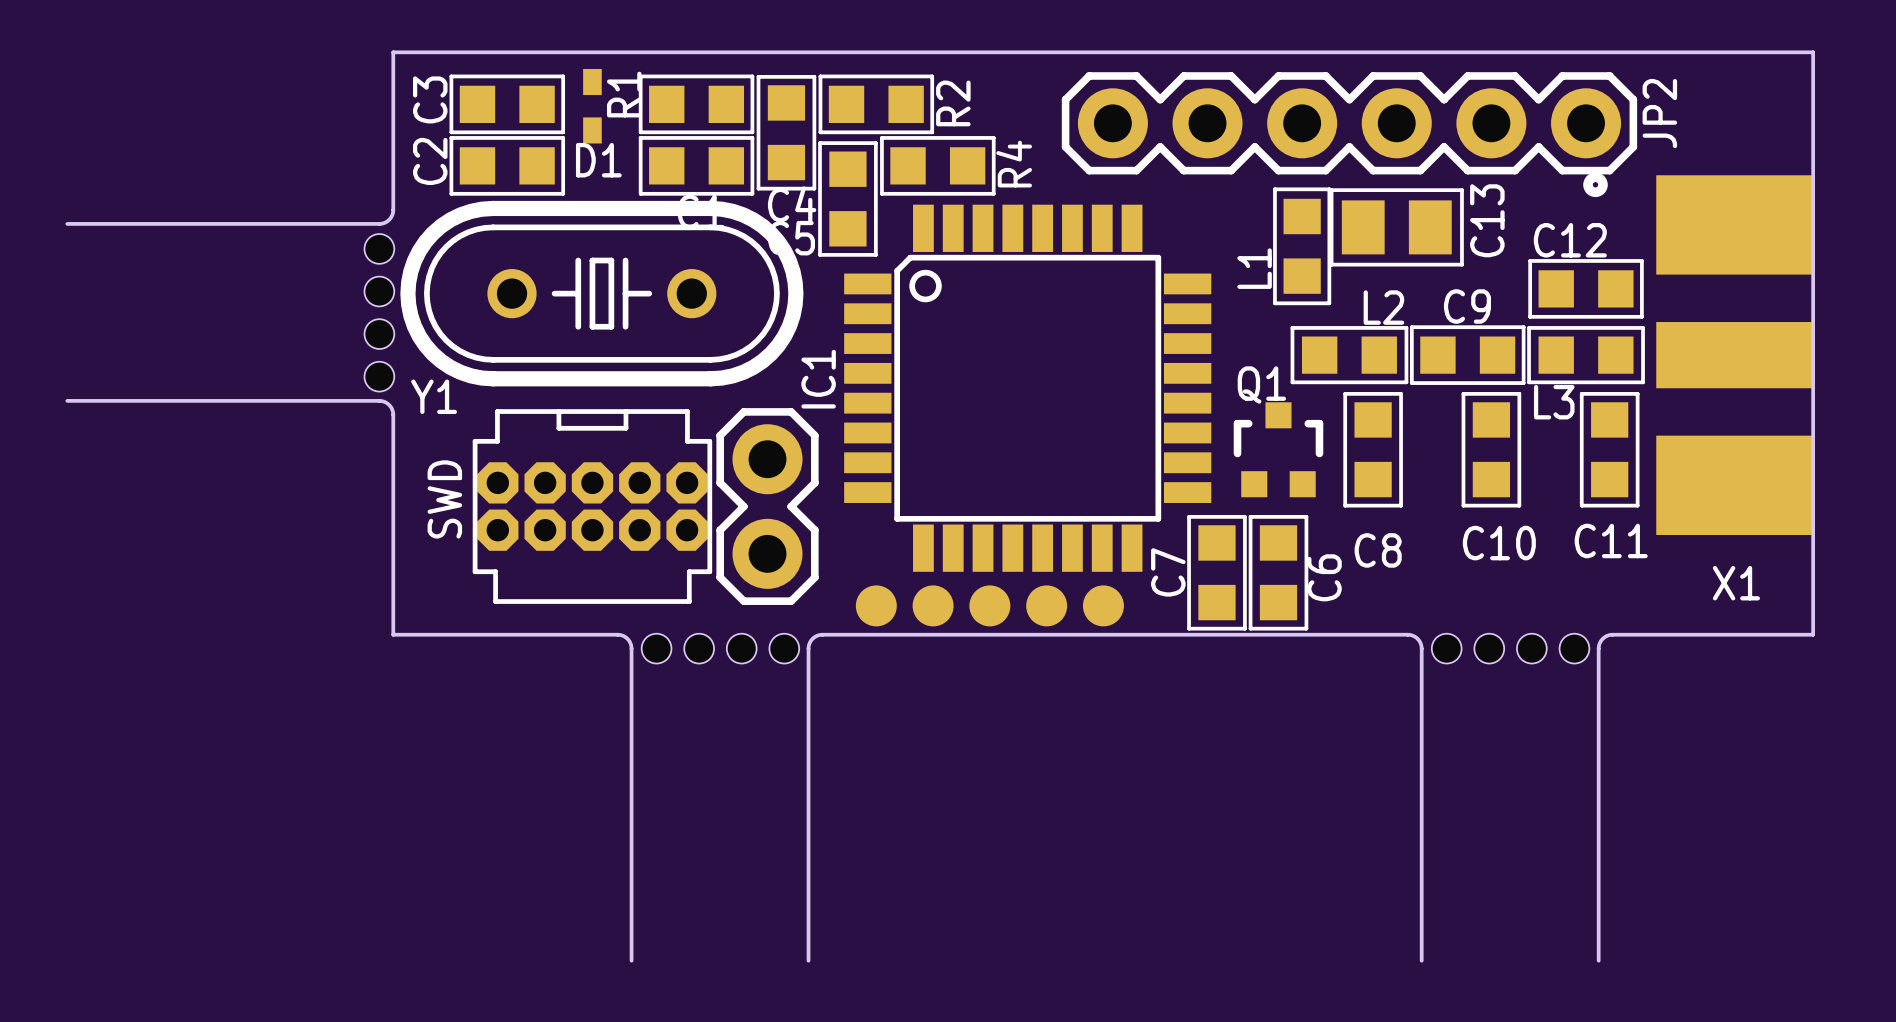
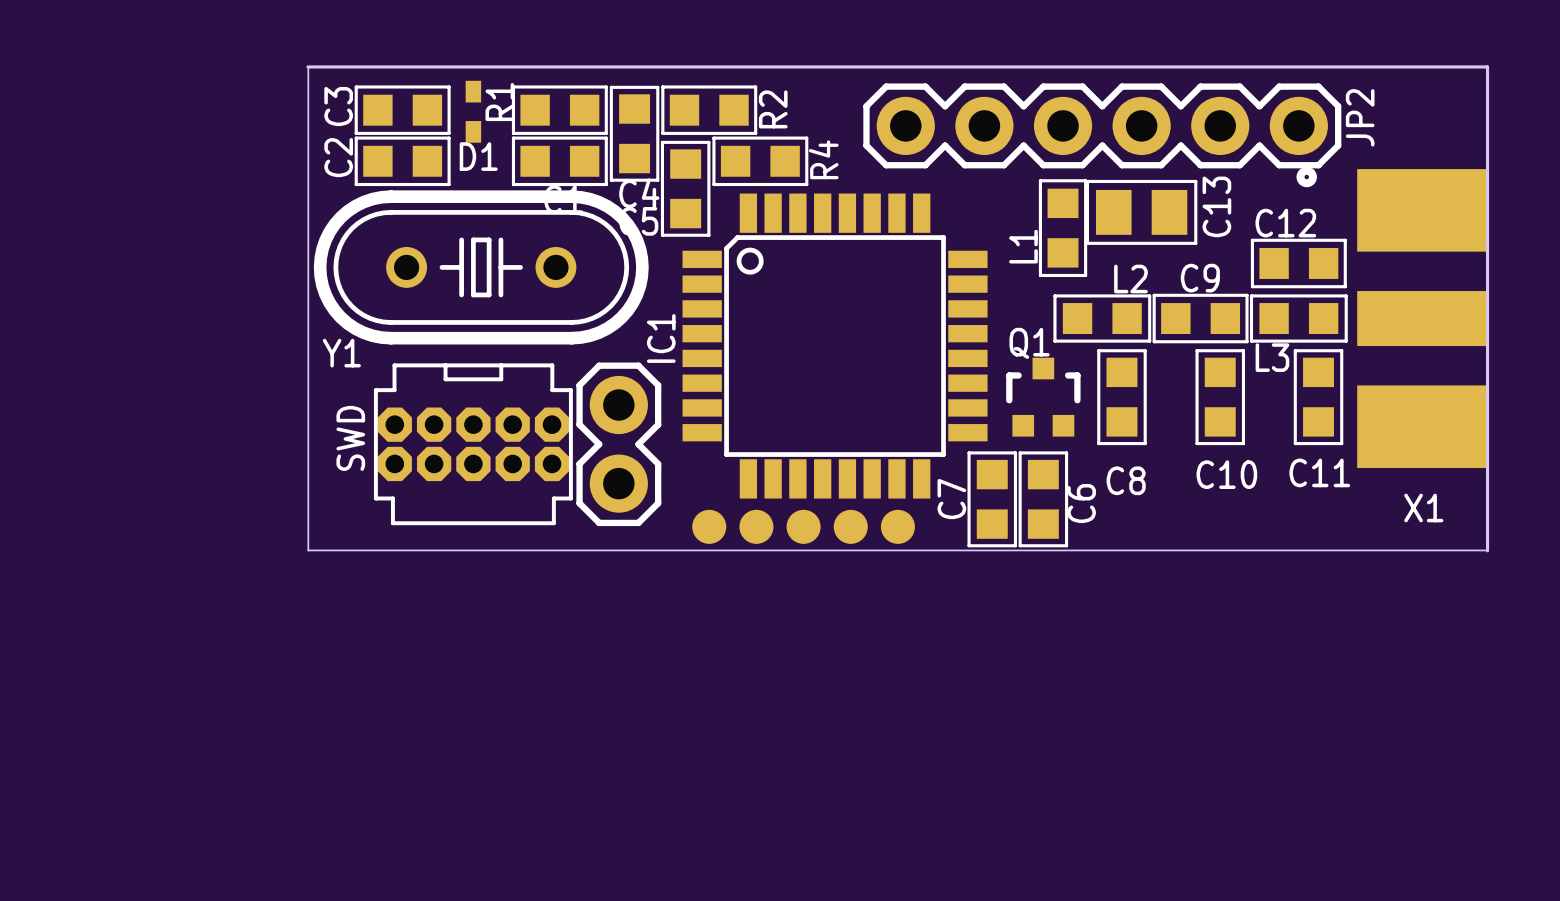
board edge: (393, 52) (393, 209) (391, 216) (386, 222) (379, 223) (67, 223) -> none
hole: (379, 248) -> none
hole: (379, 291) -> none
hole: (379, 334) -> none
hole: (379, 376) -> none
board edge: (67, 400) (384, 401) (391, 407) (393, 414) (393, 634) (617, 634) (627, 638) (631, 648) (631, 960) -> none
board edge: (1813, 634) (1612, 634) (1605, 636) (1600, 641) (1598, 648) (1598, 960) -> (1487, 550) (308, 550) (308, 66)
hole: (656, 648) -> none
hole: (699, 648) -> none
hole: (741, 648) -> none
hole: (784, 648) -> none
hole: (1446, 648) -> none
hole: (1489, 648) -> none
hole: (1531, 648) -> none
hole: (1574, 648) -> none
board edge: (808, 960) (808, 648) (812, 638) (822, 634) (1407, 634) (1414, 636) (1419, 641) (1421, 648) (1421, 960) -> none

